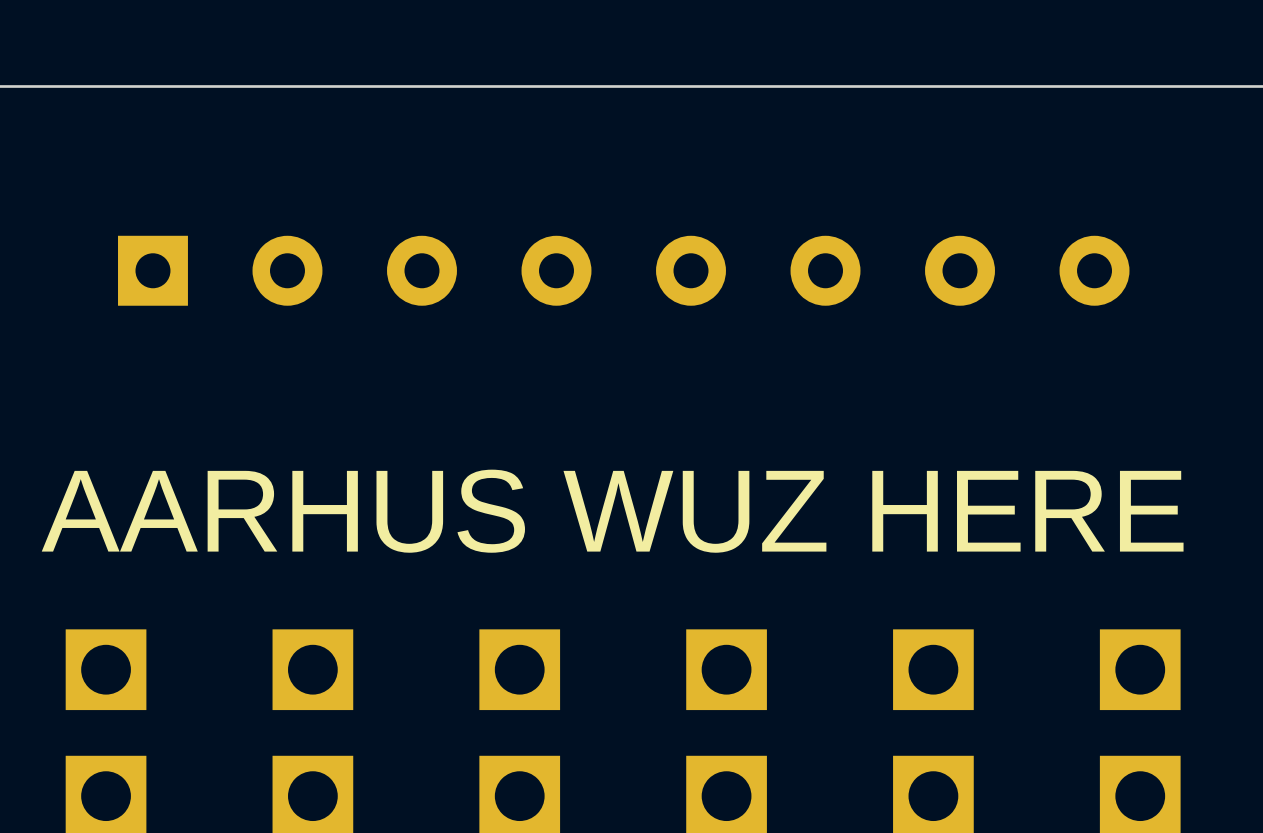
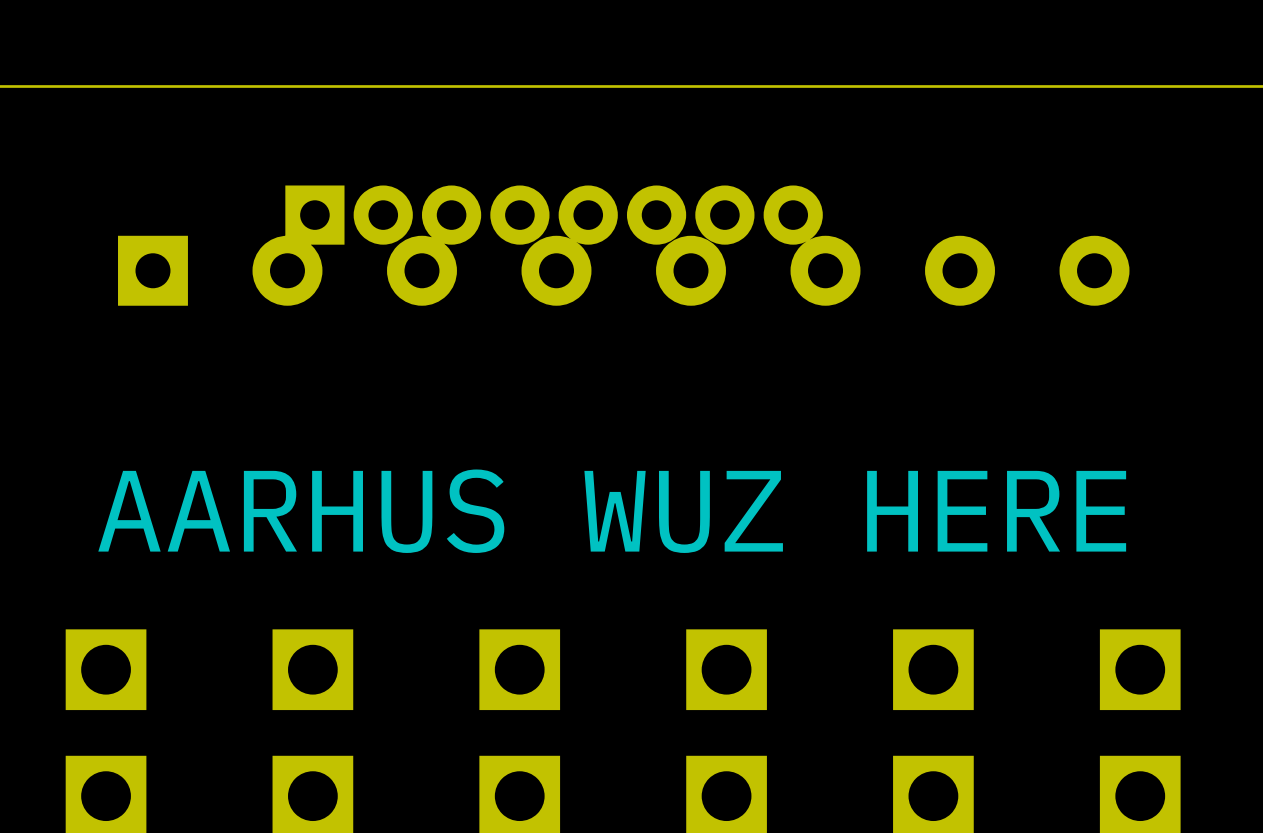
part: none -> (554, 215)

